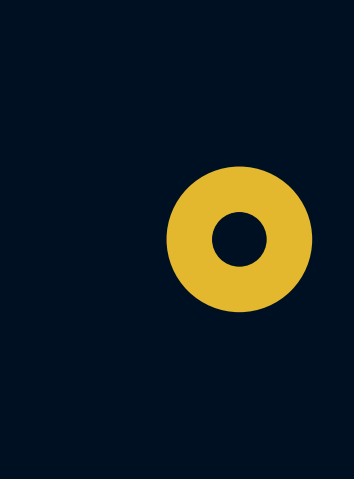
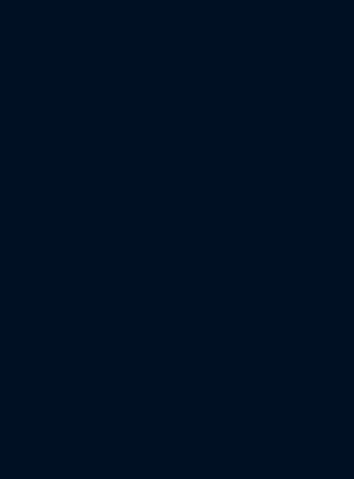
part: (239, 239) -> none

